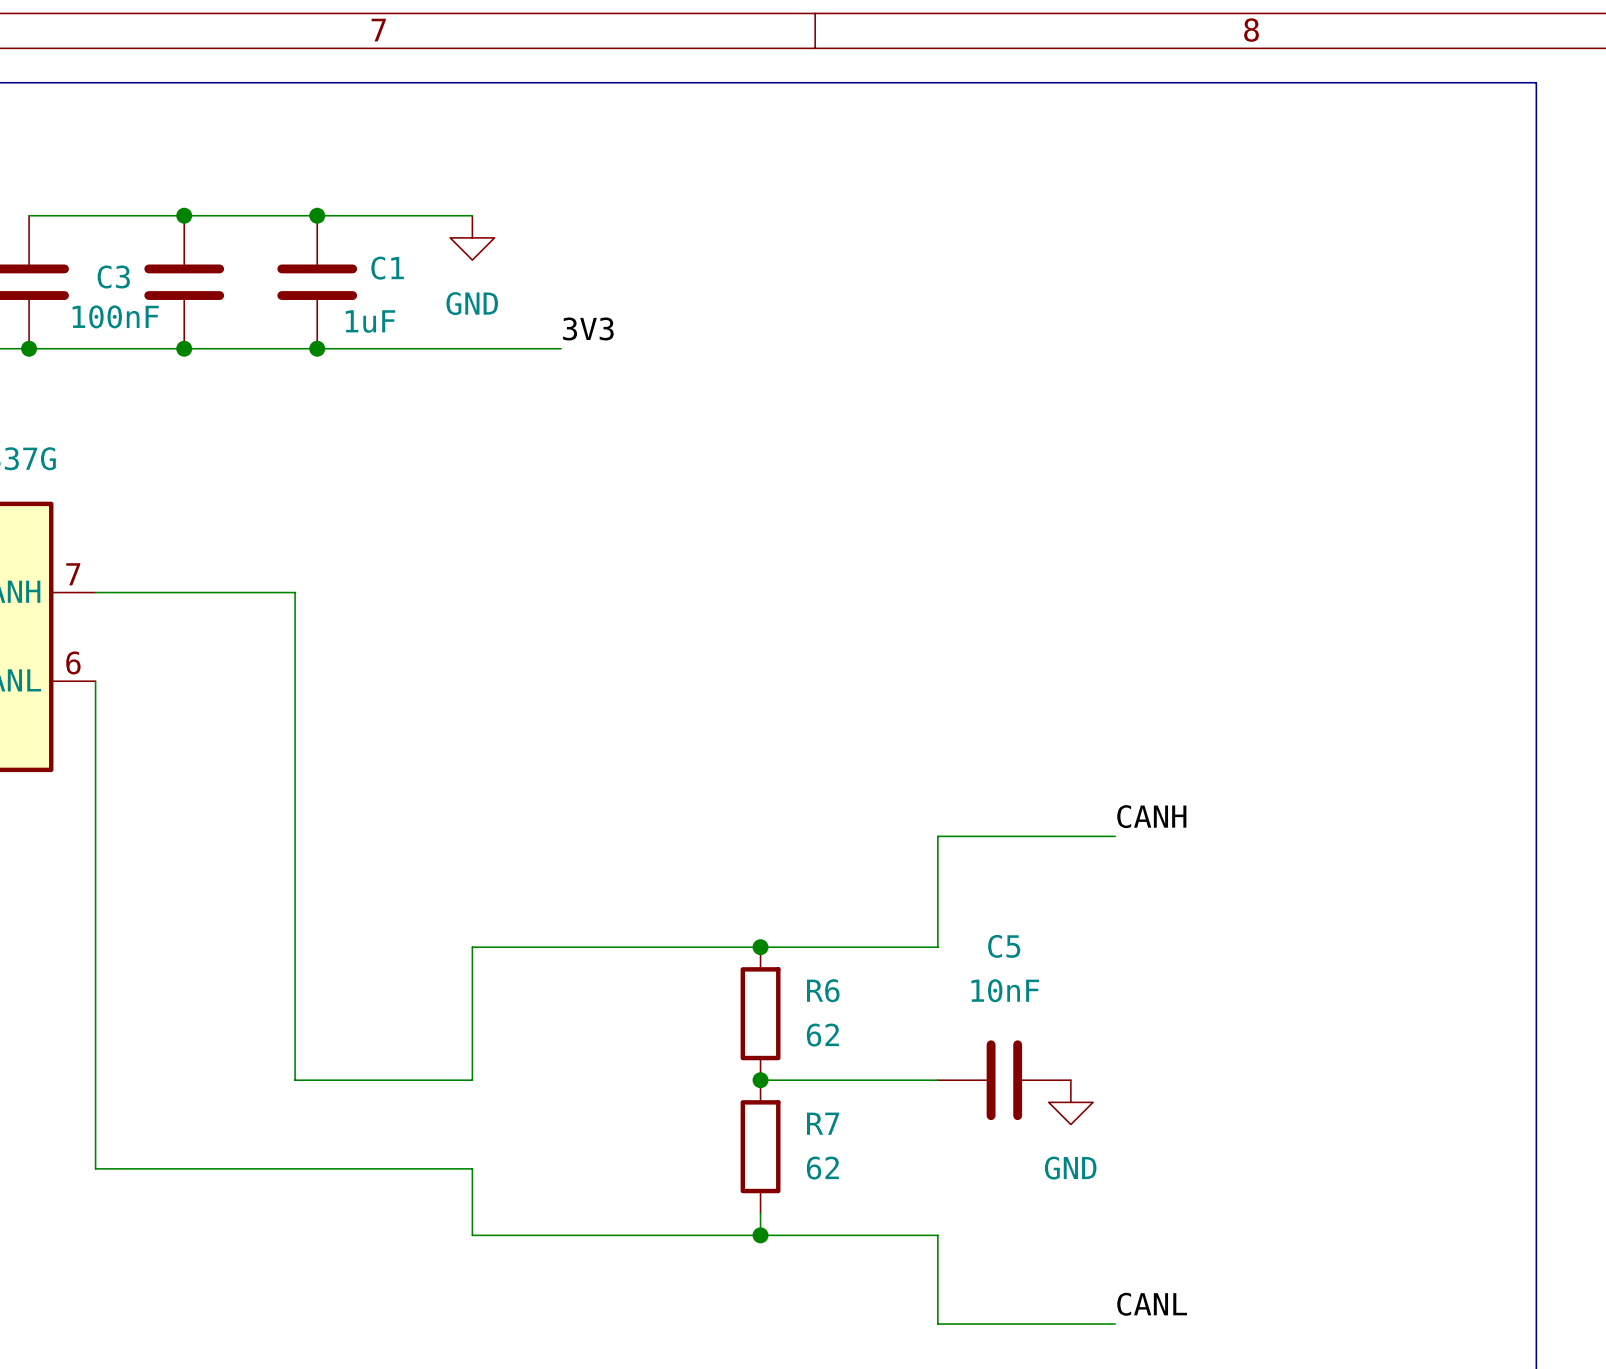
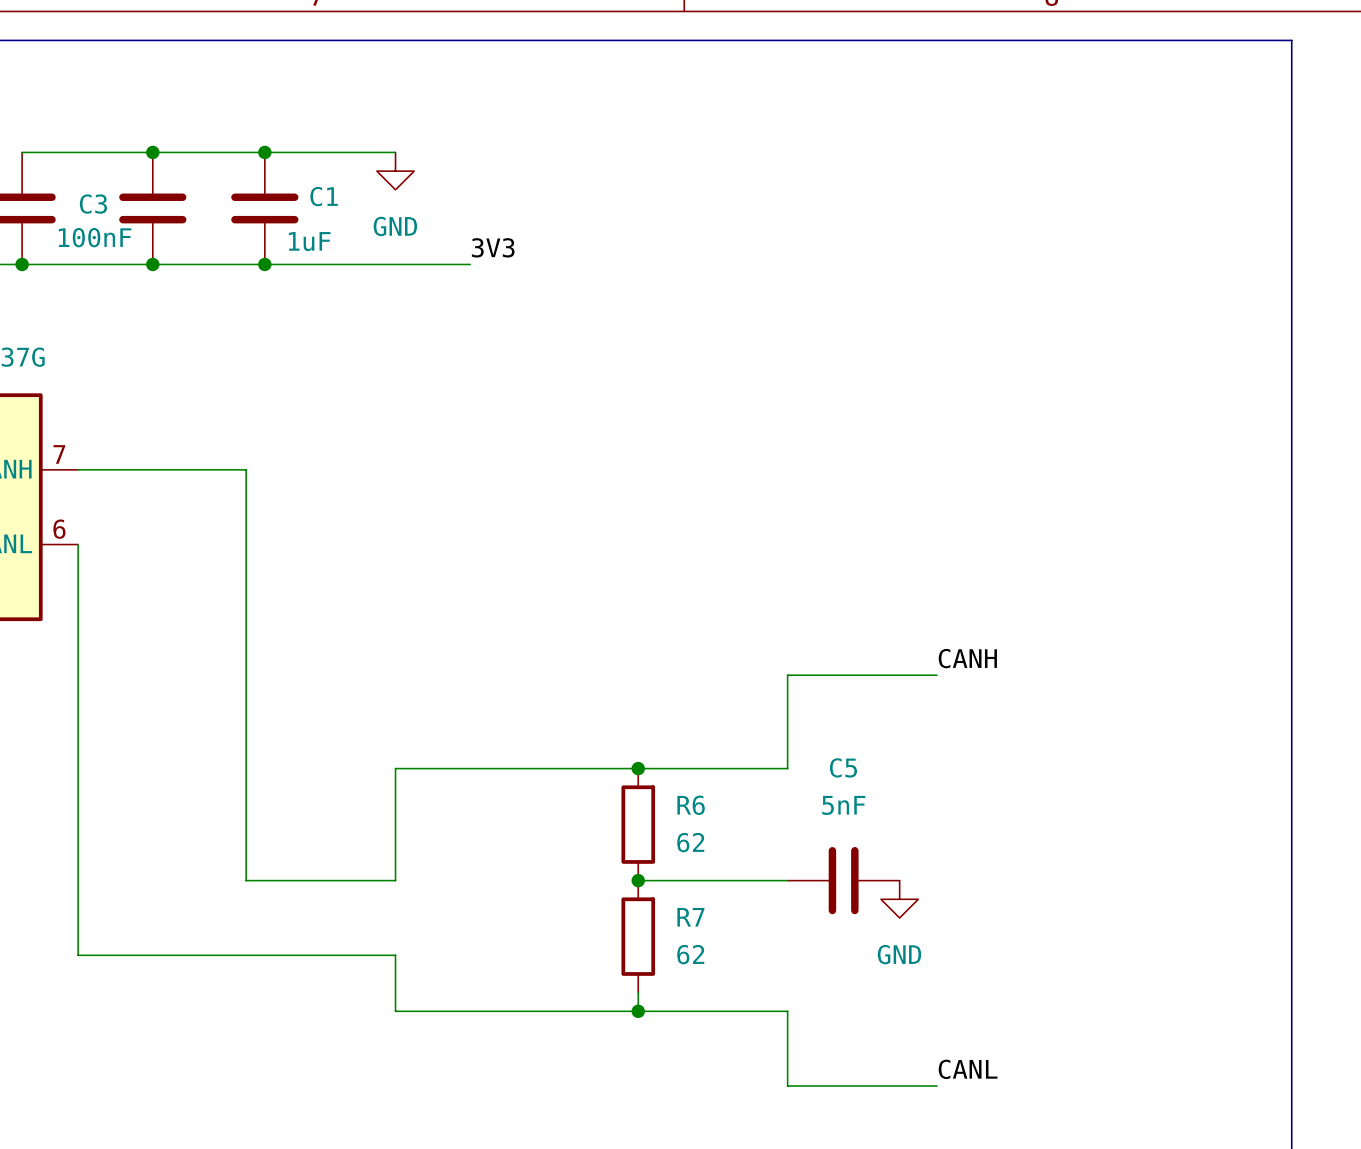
C5 value: 10nF (1005, 990) -> 5nF (843, 805)

